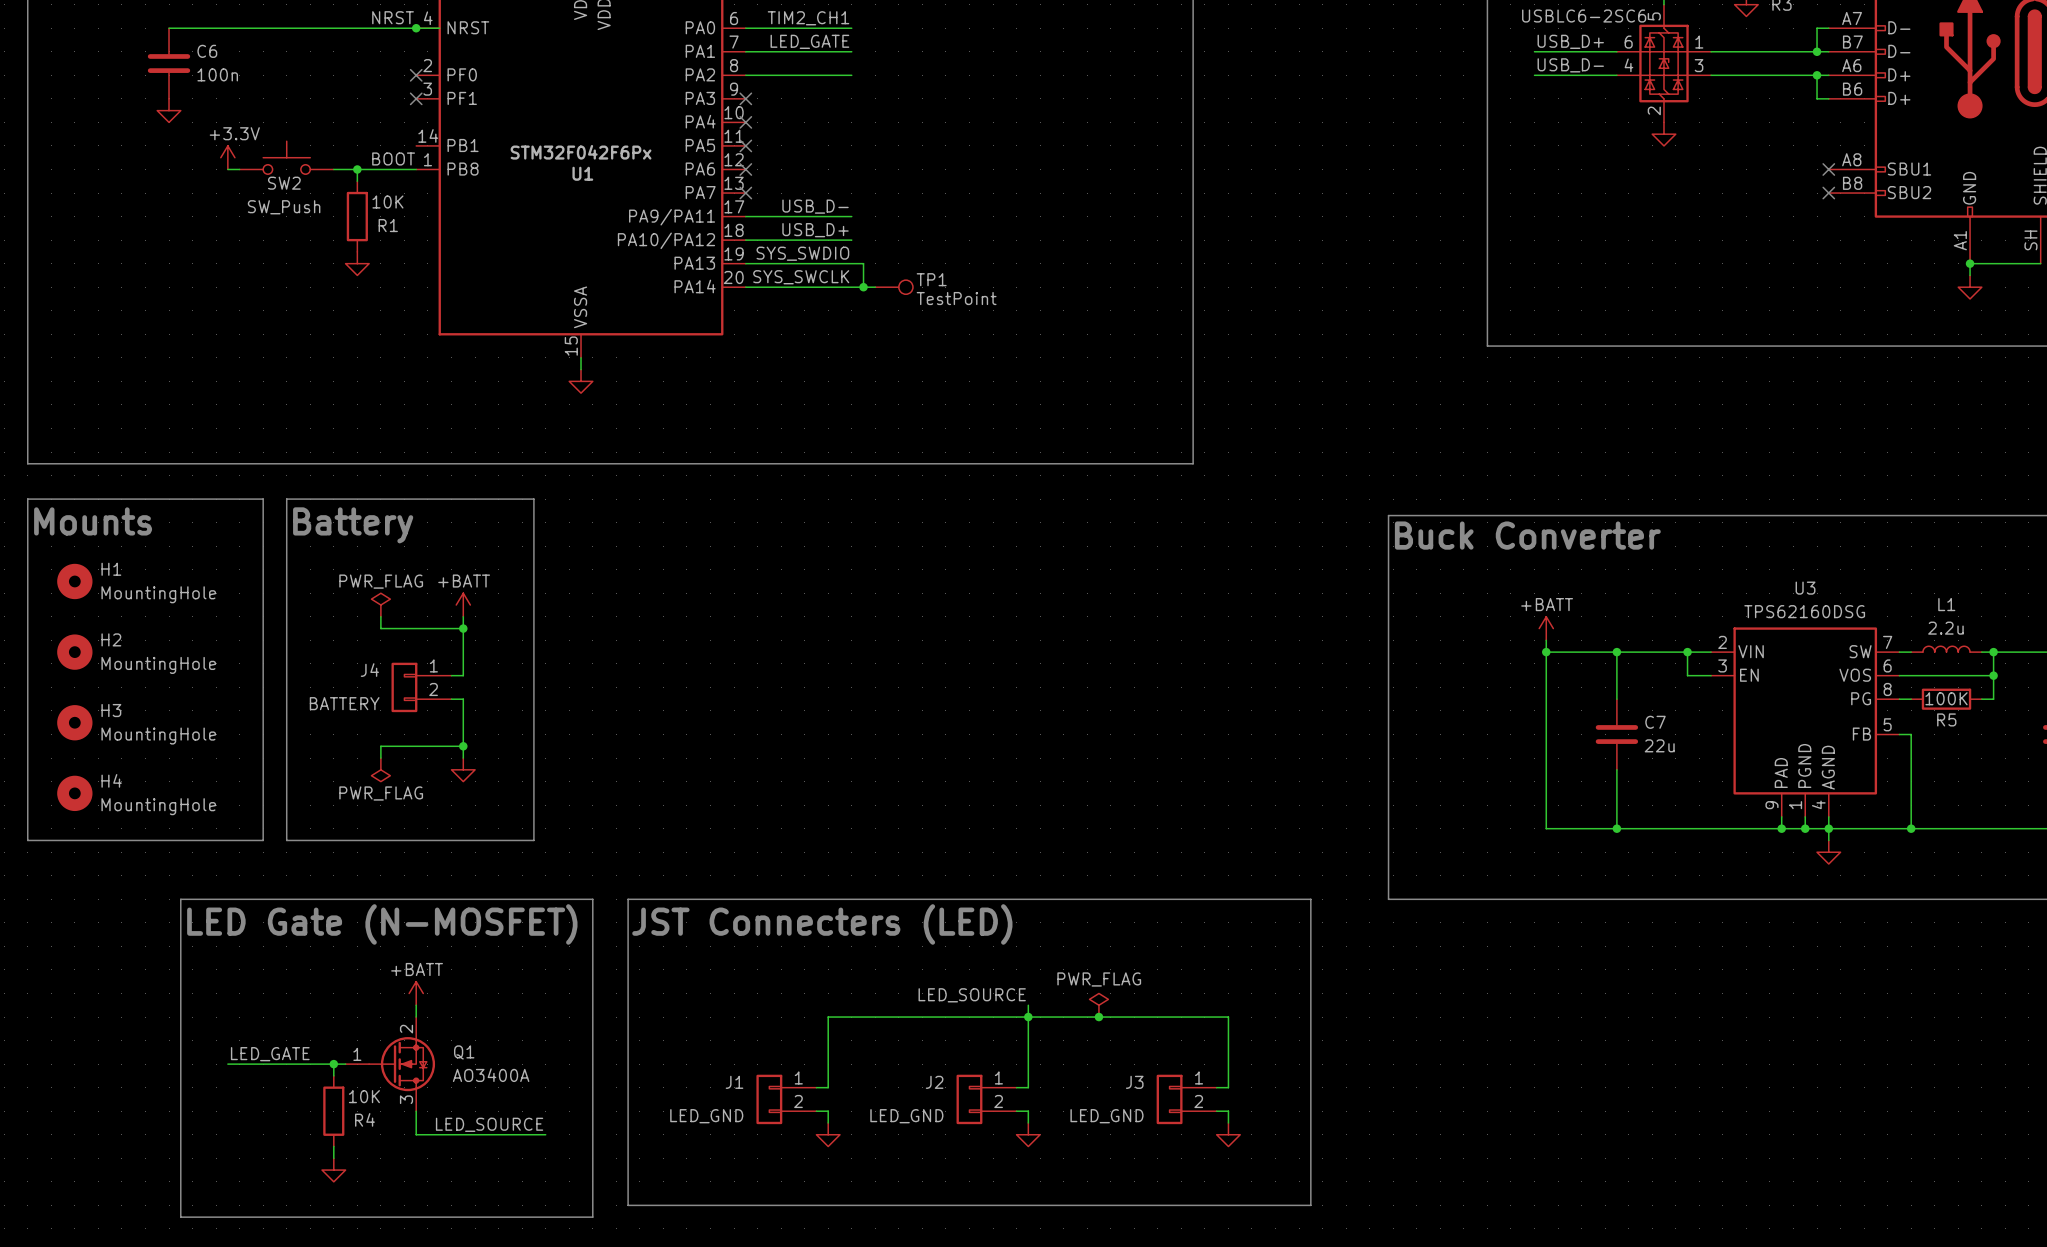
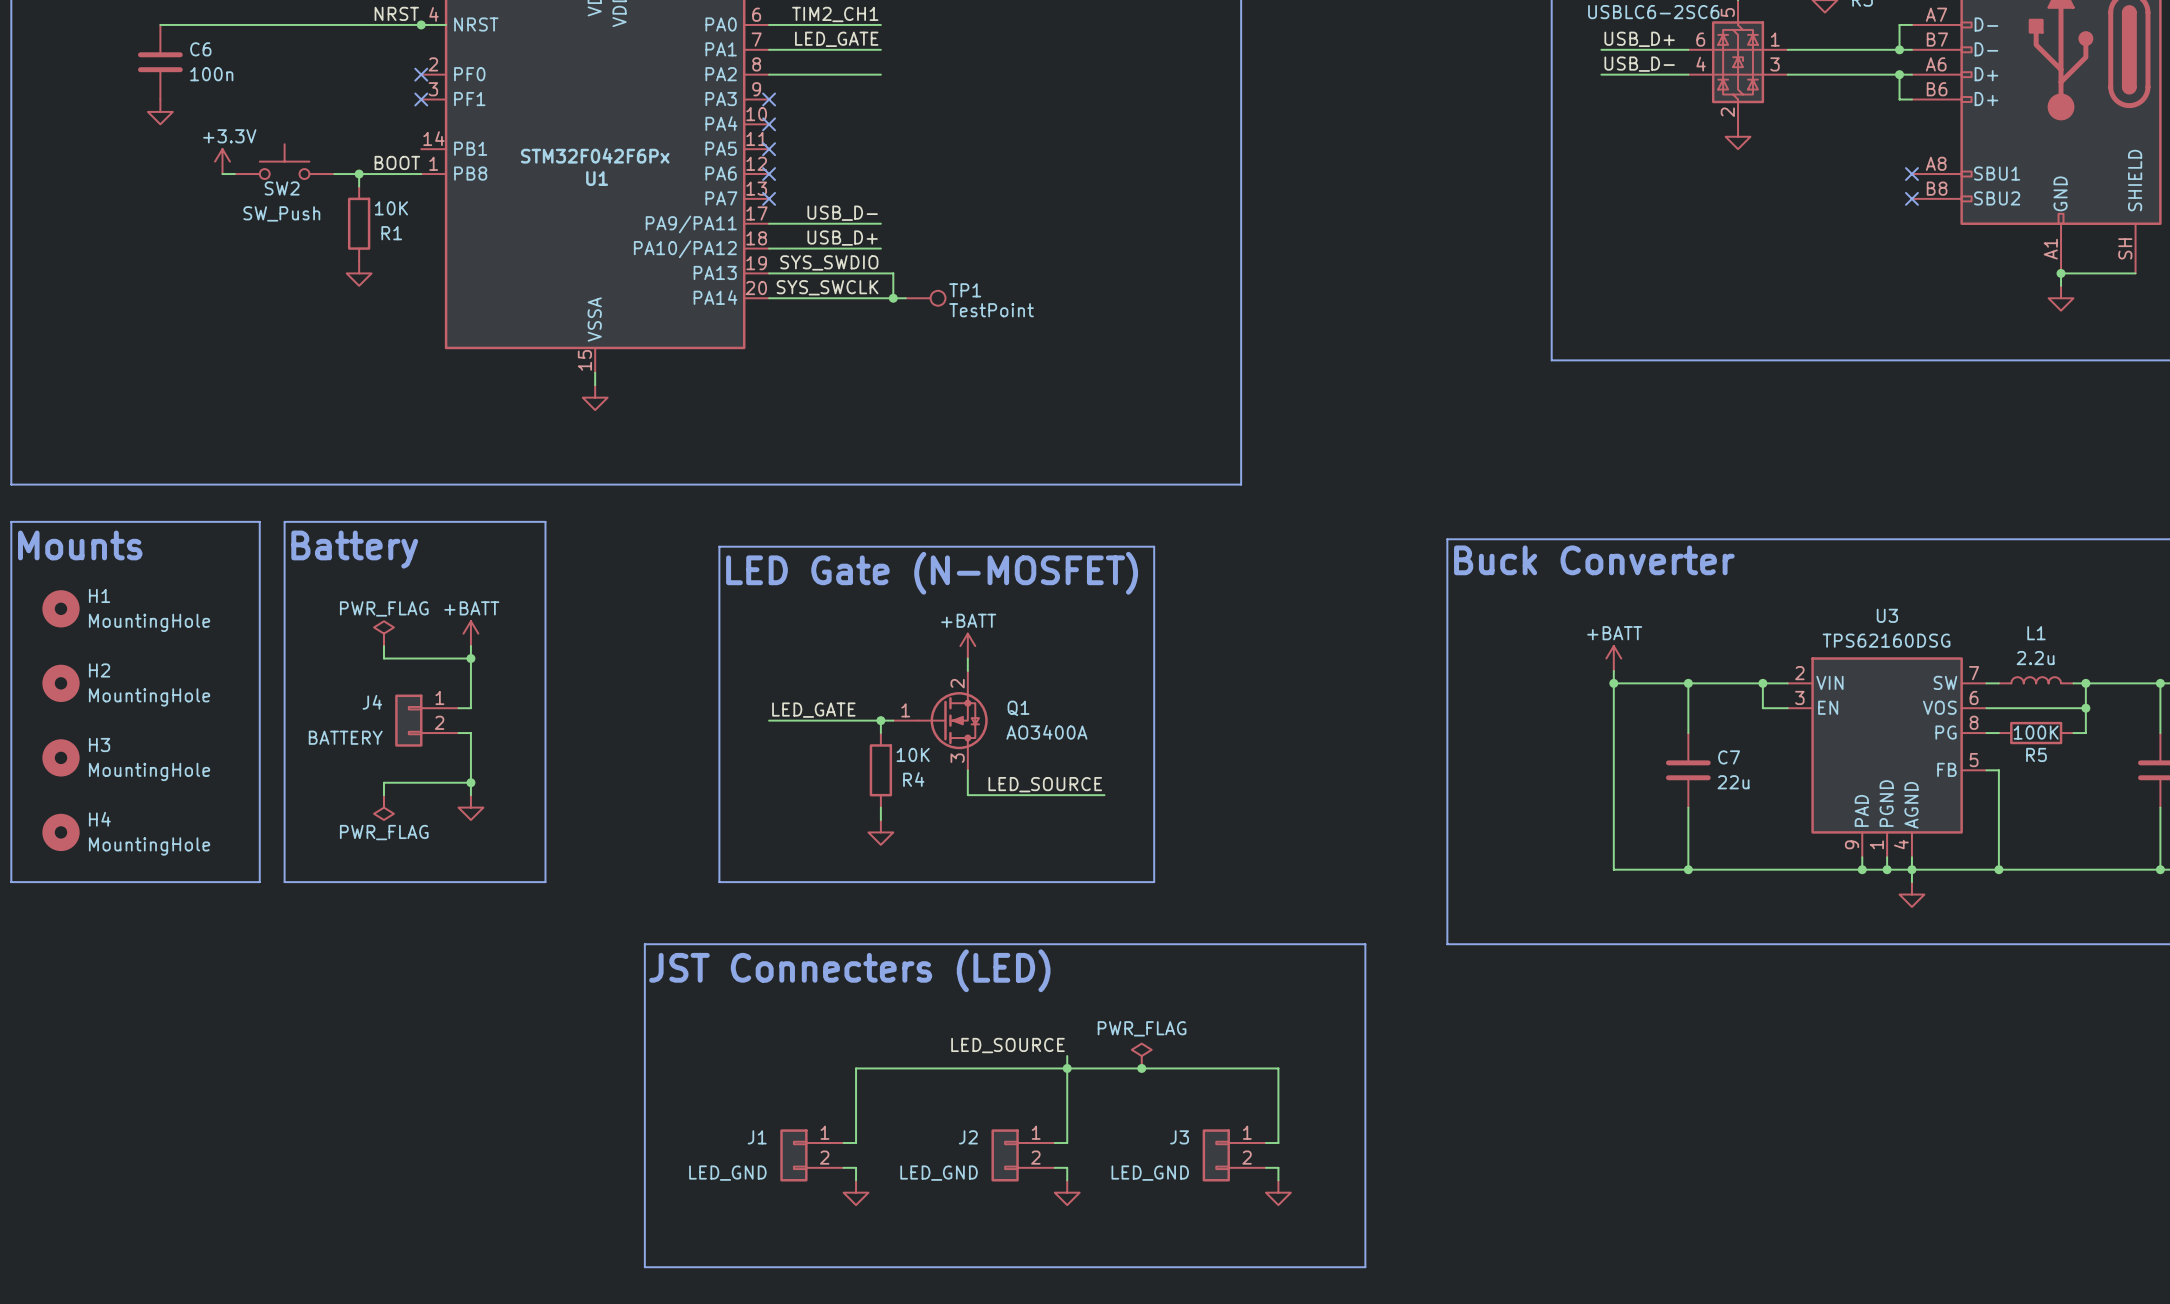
line: none -> (719, 546) (1154, 546) (1154, 882) (719, 882) (719, 546)
text: none -> LED Gate (N-MOSFET) (932, 573)
power symbol: none -> +BATT (967, 646)
wire: none -> (967, 658) (967, 670)
label: none -> LED_GATE (813, 710)
wire: none -> (769, 720) (893, 720)
wire: none -> (880, 720) (880, 733)
junction: none -> (880, 720)
wire: none -> (967, 770) (967, 795) (1104, 795)
label: none -> LED_SOURCE (1045, 784)
wire: none -> (880, 807) (880, 820)
power symbol: none -> (880, 832)
line: (180, 899) (592, 899) (592, 1217) (180, 1217) (180, 899) -> none
text: LED Gate (N-MOSFET) (382, 924) -> none
power symbol: +BATT (416, 993) -> none
wire: (416, 1005) (416, 1017) -> none
label: LED_GATE (270, 1054) -> none
wire: (227, 1064) (345, 1064) -> none
wire: (333, 1064) (333, 1075) -> none
junction: (333, 1064) -> none
Q1 position: (390, 1064) -> (940, 720)
R4 position: (333, 1111) -> (880, 770)
wire: (416, 1111) (416, 1134) (545, 1134) -> none
label: LED_SOURCE (489, 1124) -> none
wire: (333, 1146) (333, 1158) -> none
power symbol: (333, 1170) -> none

